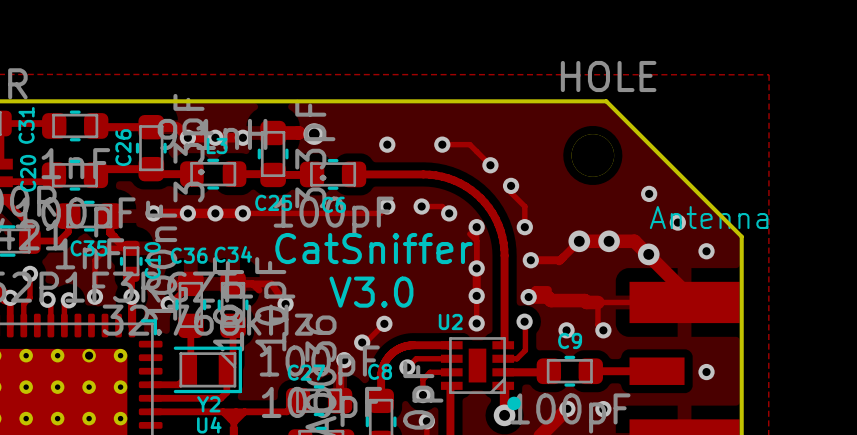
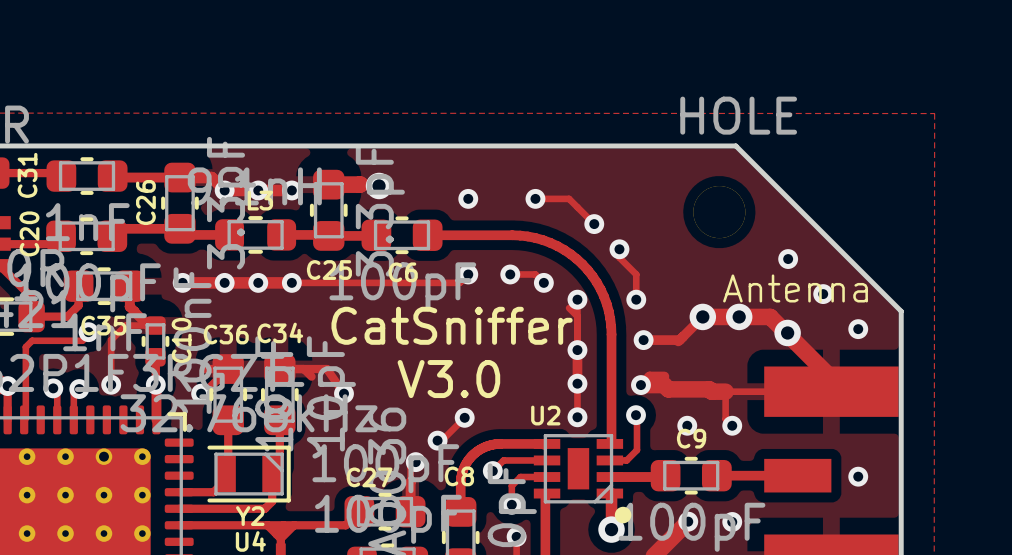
part value position: Antenna (709, 217) -> Antenna (795, 288)
track: (30, 273) (30, 297) (23, 304) (23, 325) -> (88, 332) (82, 340) (32, 340) (25, 347) (25, 418) (24, 419)
via position: (30, 273) -> (88, 332)

